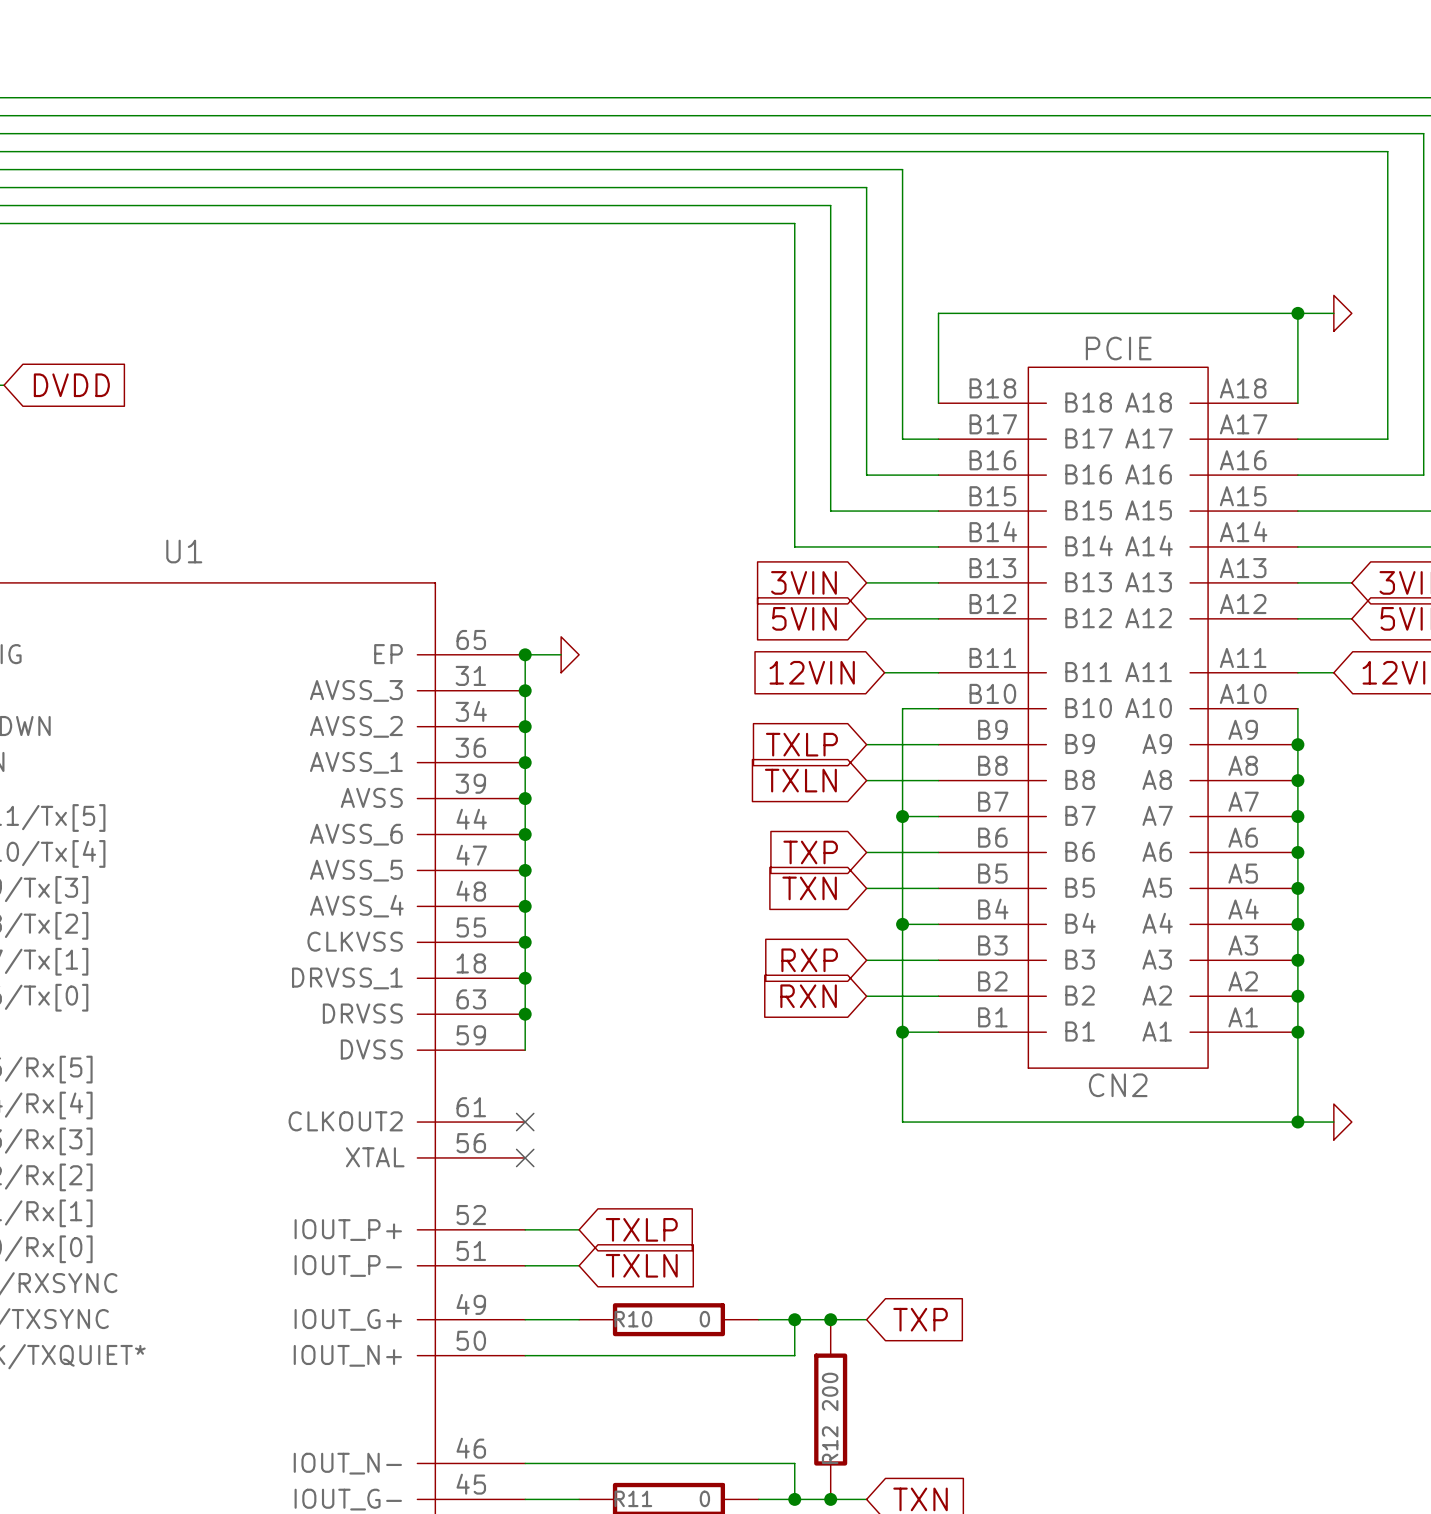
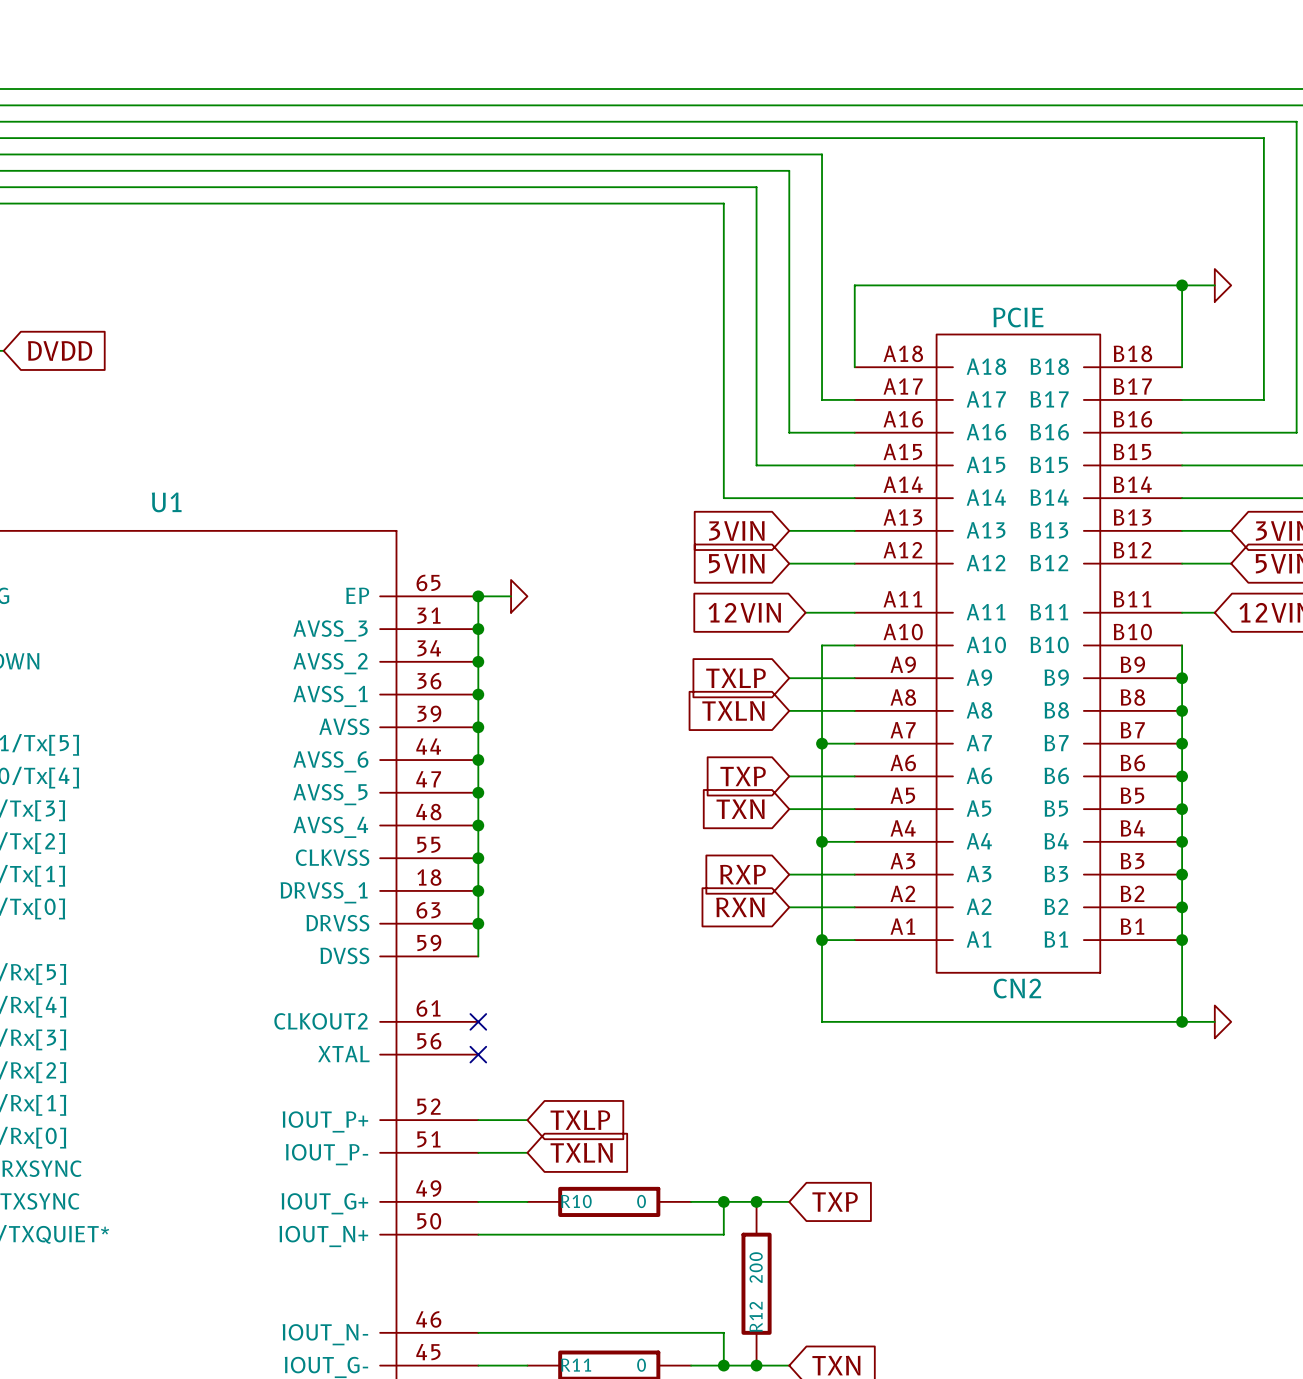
CN2 flip: as is (1118, 717) -> left-right (1018, 653)

